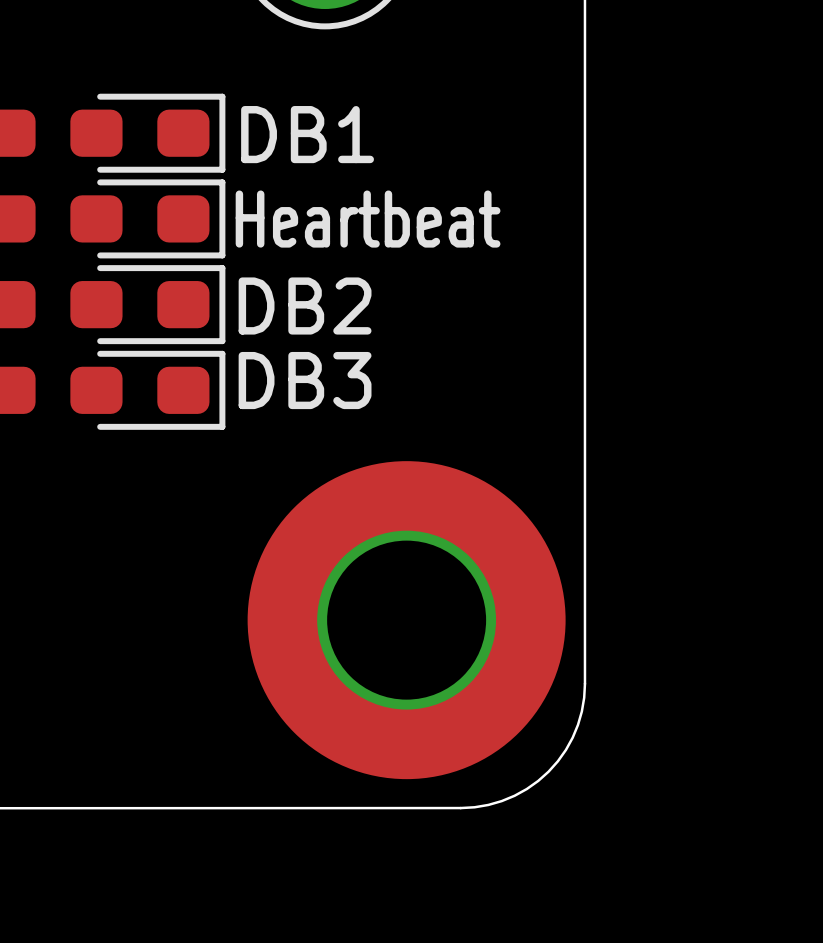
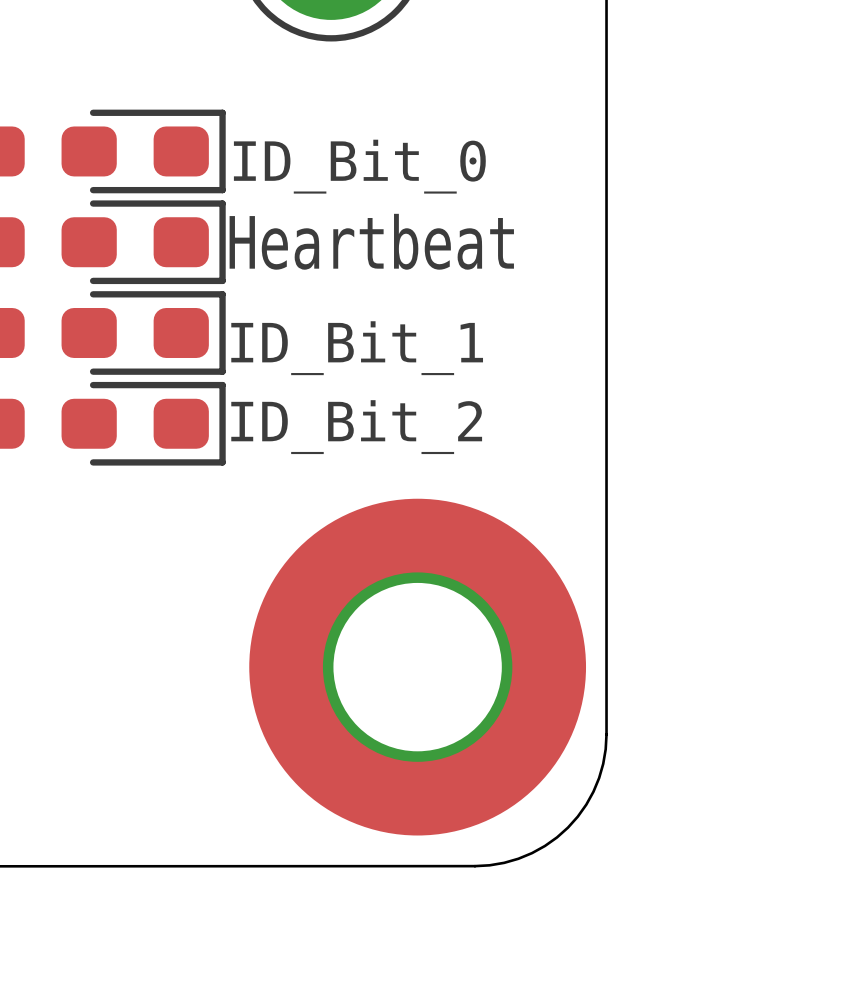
text: DB1 (307, 134) -> ID_Bit_0 (359, 166)
text: DB2 (305, 306) -> ID_Bit_1 (357, 348)
text: DB3 (305, 380) -> ID_Bit_2 (356, 427)

